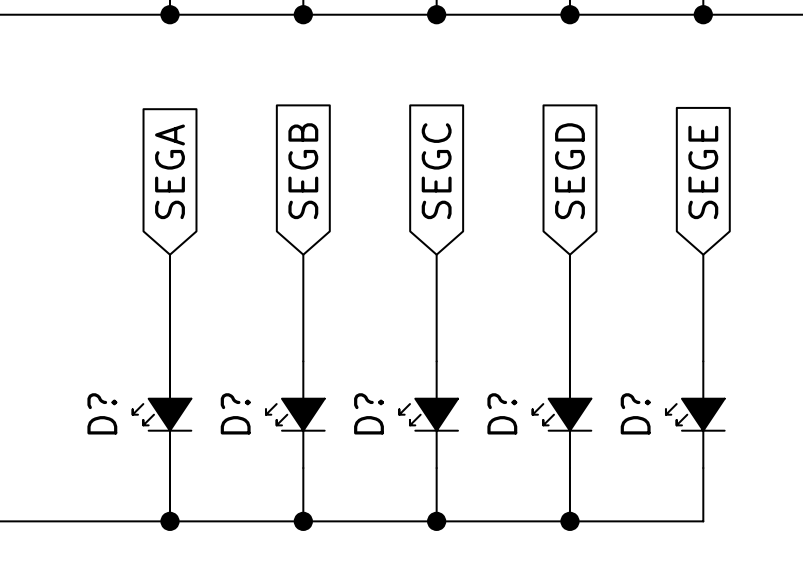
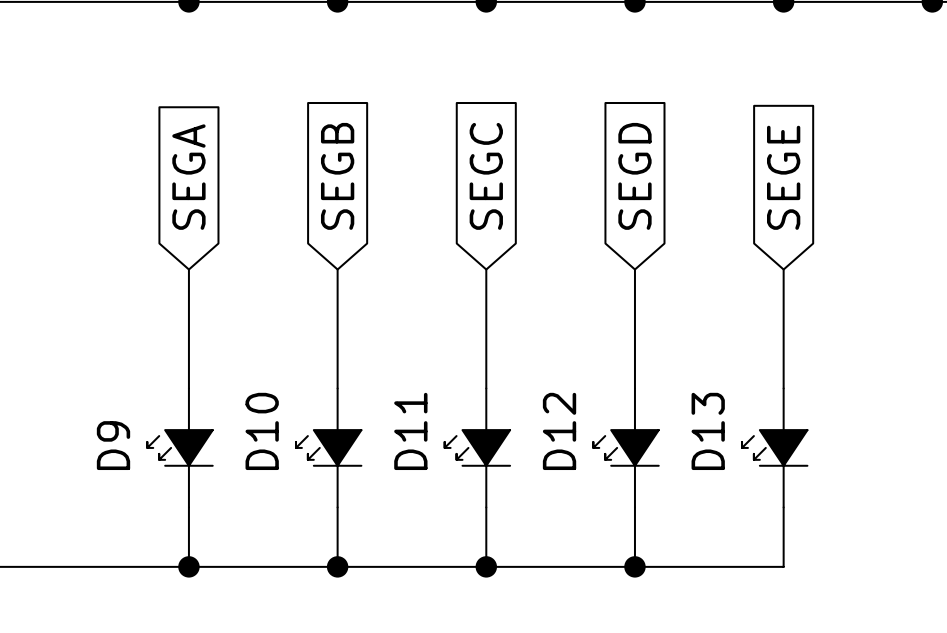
D? name: D? (102, 413) -> D9 (113, 445)
D? name: D? (235, 413) -> D10 (262, 431)
D? name: D? (368, 413) -> D11 (410, 431)
D? name: D? (502, 413) -> D12 (559, 431)
D? name: D? (635, 413) -> D13 (708, 431)

